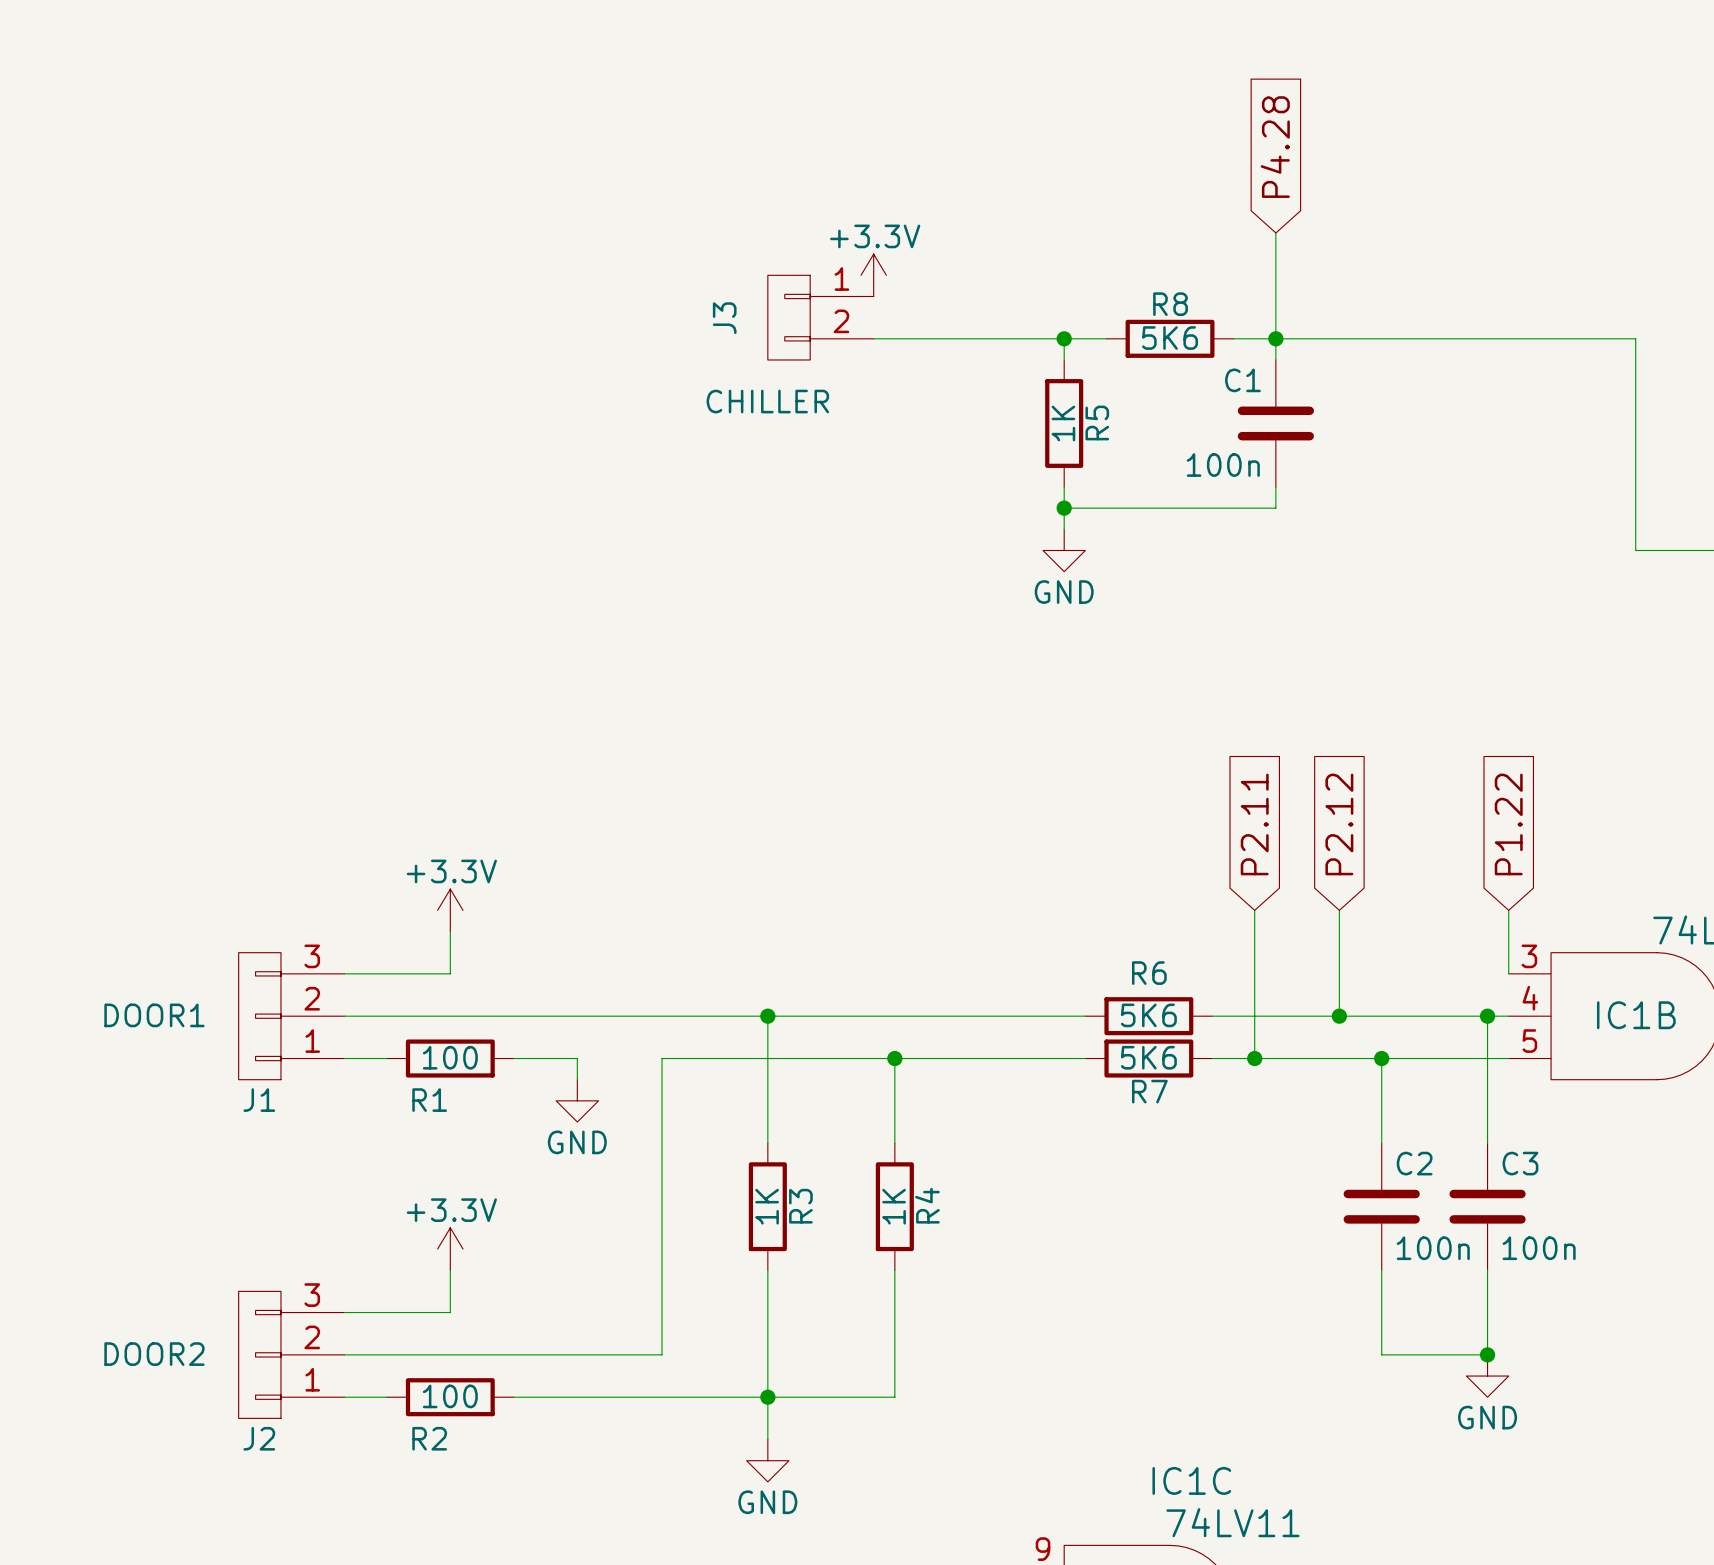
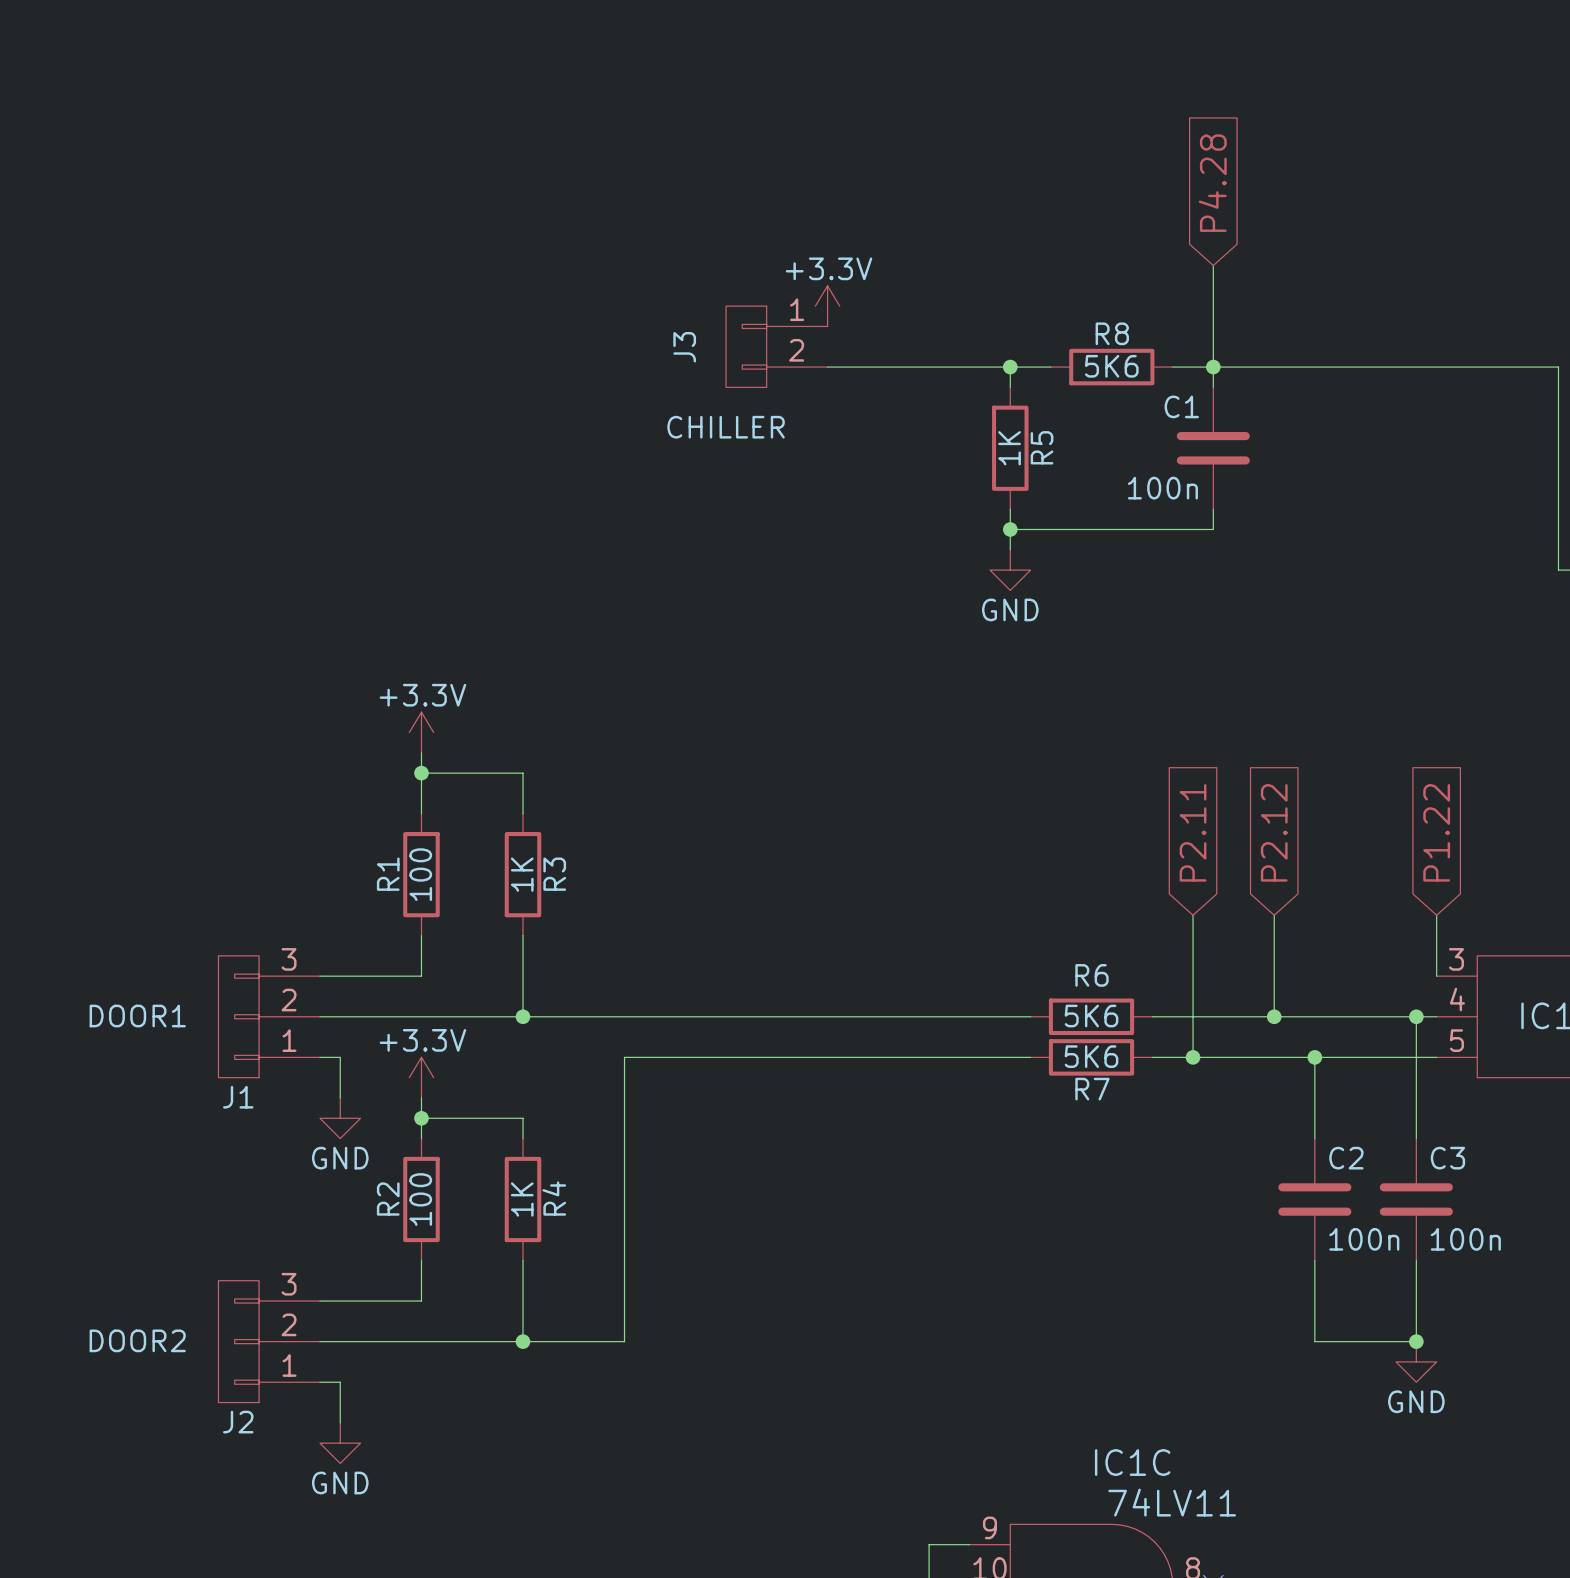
power symbol: none -> +3.3V (421, 732)
wire: none -> (421, 752) (421, 813)
wire: none -> (421, 773) (523, 773) (523, 813)
junction: none -> (421, 773)
power symbol: +3.3V (450, 910) -> none
junction: none -> (523, 1016)
wire: (767, 1016) (767, 1143) -> none
junction: (767, 1016) -> none
wire: (365, 1058) (386, 1058) -> (340, 1057) (340, 1097)
R1 rotation: 0° (450, 1058) -> 90° clockwise (421, 874)
R1 position: (450, 1058) -> (421, 874)
wire: (513, 1058) (577, 1058) (577, 1079) -> none
wire: (894, 1058) (894, 1143) -> (523, 935) (523, 1016)
junction: (894, 1058) -> none
power symbol: none -> +3.3V (421, 1077)
wire: none -> (421, 1097) (421, 1138)
power symbol: GND (577, 1100) -> none
power symbol: none -> GND (340, 1118)
wire: none -> (421, 1118) (523, 1118) (523, 1138)
junction: none -> (421, 1118)
R3 position: (767, 1206) -> (523, 874)
R4 position: (894, 1206) -> (523, 1199)
power symbol: +3.3V (450, 1249) -> none
wire: none -> (523, 1260) (523, 1341)
wire: (767, 1270) (767, 1439) -> none
wire: (894, 1270) (894, 1397) (513, 1397) -> none
junction: none -> (523, 1341)
wire: (365, 1397) (386, 1397) -> (340, 1382) (340, 1422)
R2 rotation: 0° (450, 1397) -> 90° clockwise (421, 1199)
R2 position: (450, 1397) -> (421, 1199)
junction: (767, 1397) -> none
power symbol: none -> GND (340, 1443)
power symbol: GND (767, 1460) -> none

